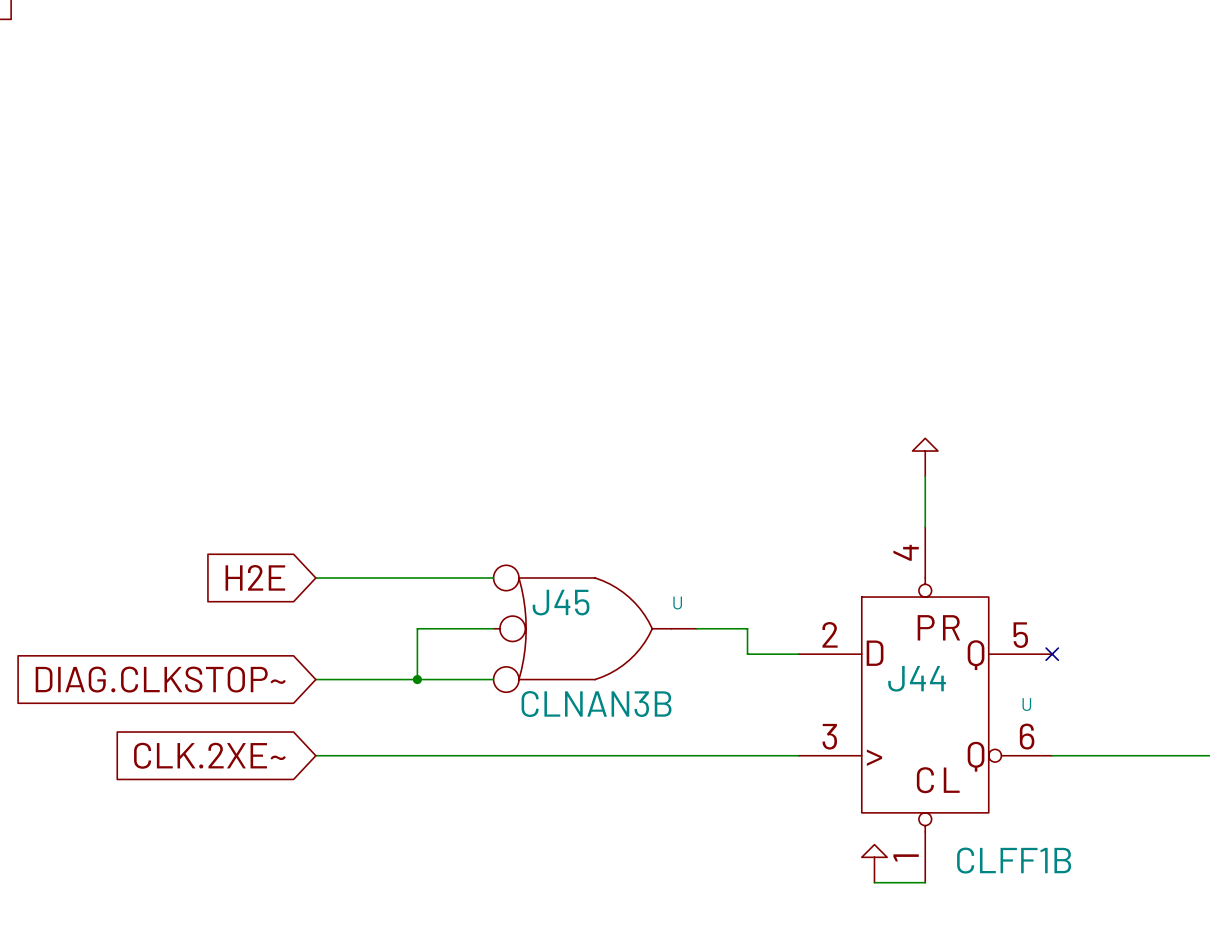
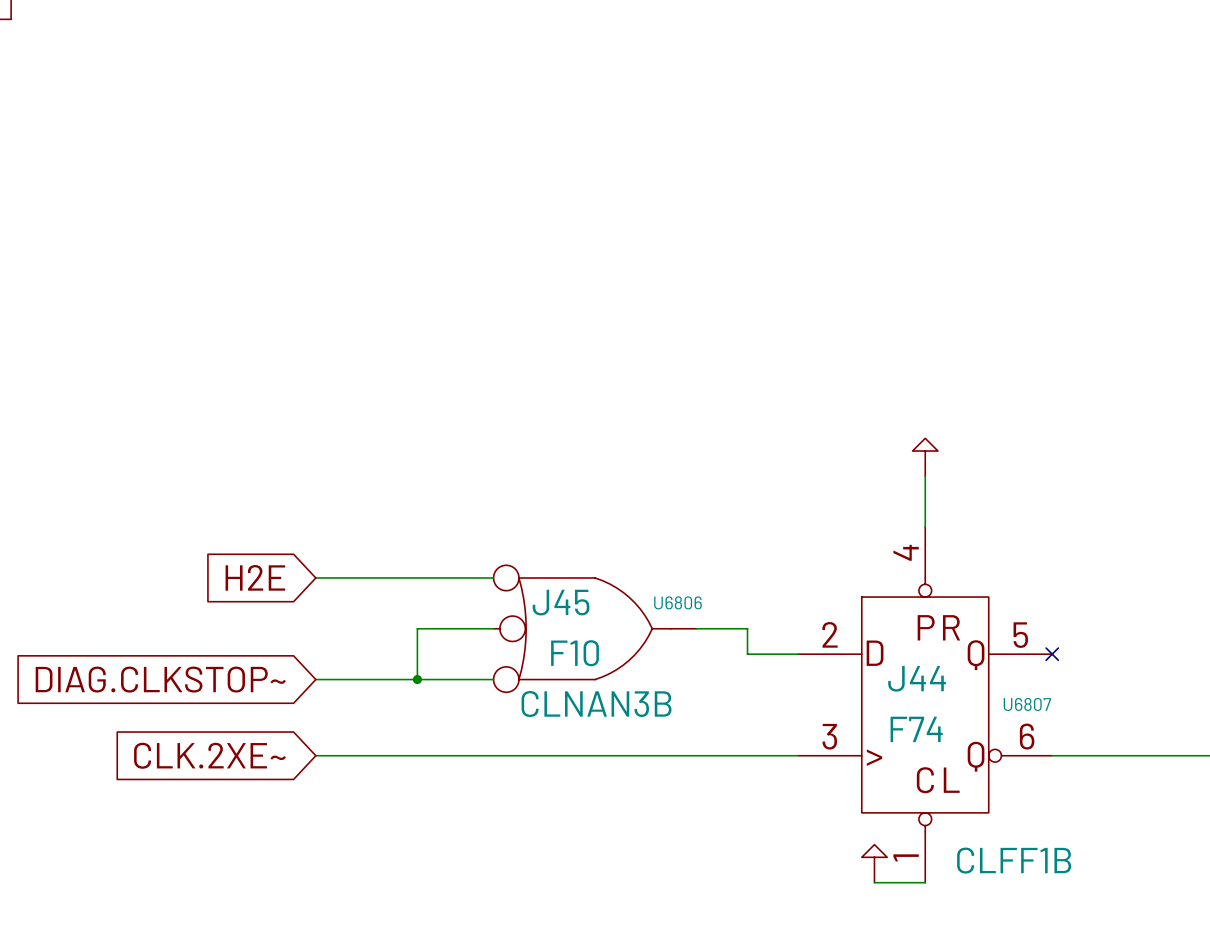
U name: U (677, 602) -> U6806 (678, 602)
U value: none -> F10 (575, 653)
U name: U (1026, 704) -> U6807 (1027, 704)
U value: none -> F74 (916, 729)

